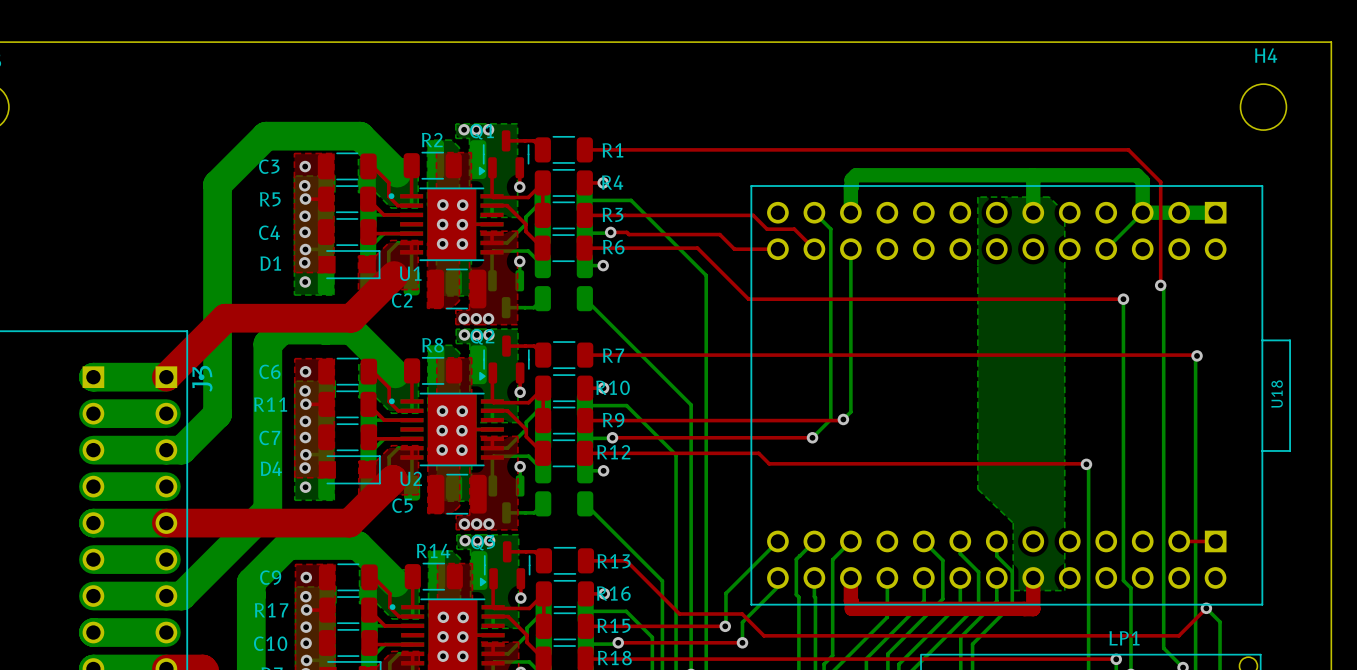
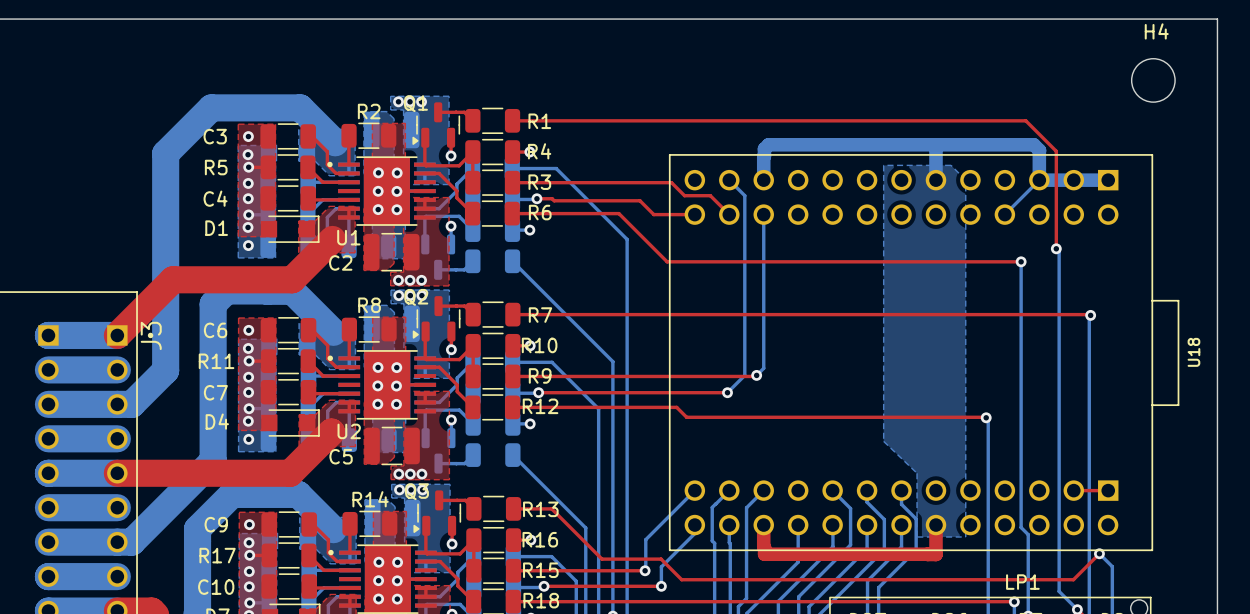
U18 name position: U18 (1277, 394) -> U18 (1193, 352)

